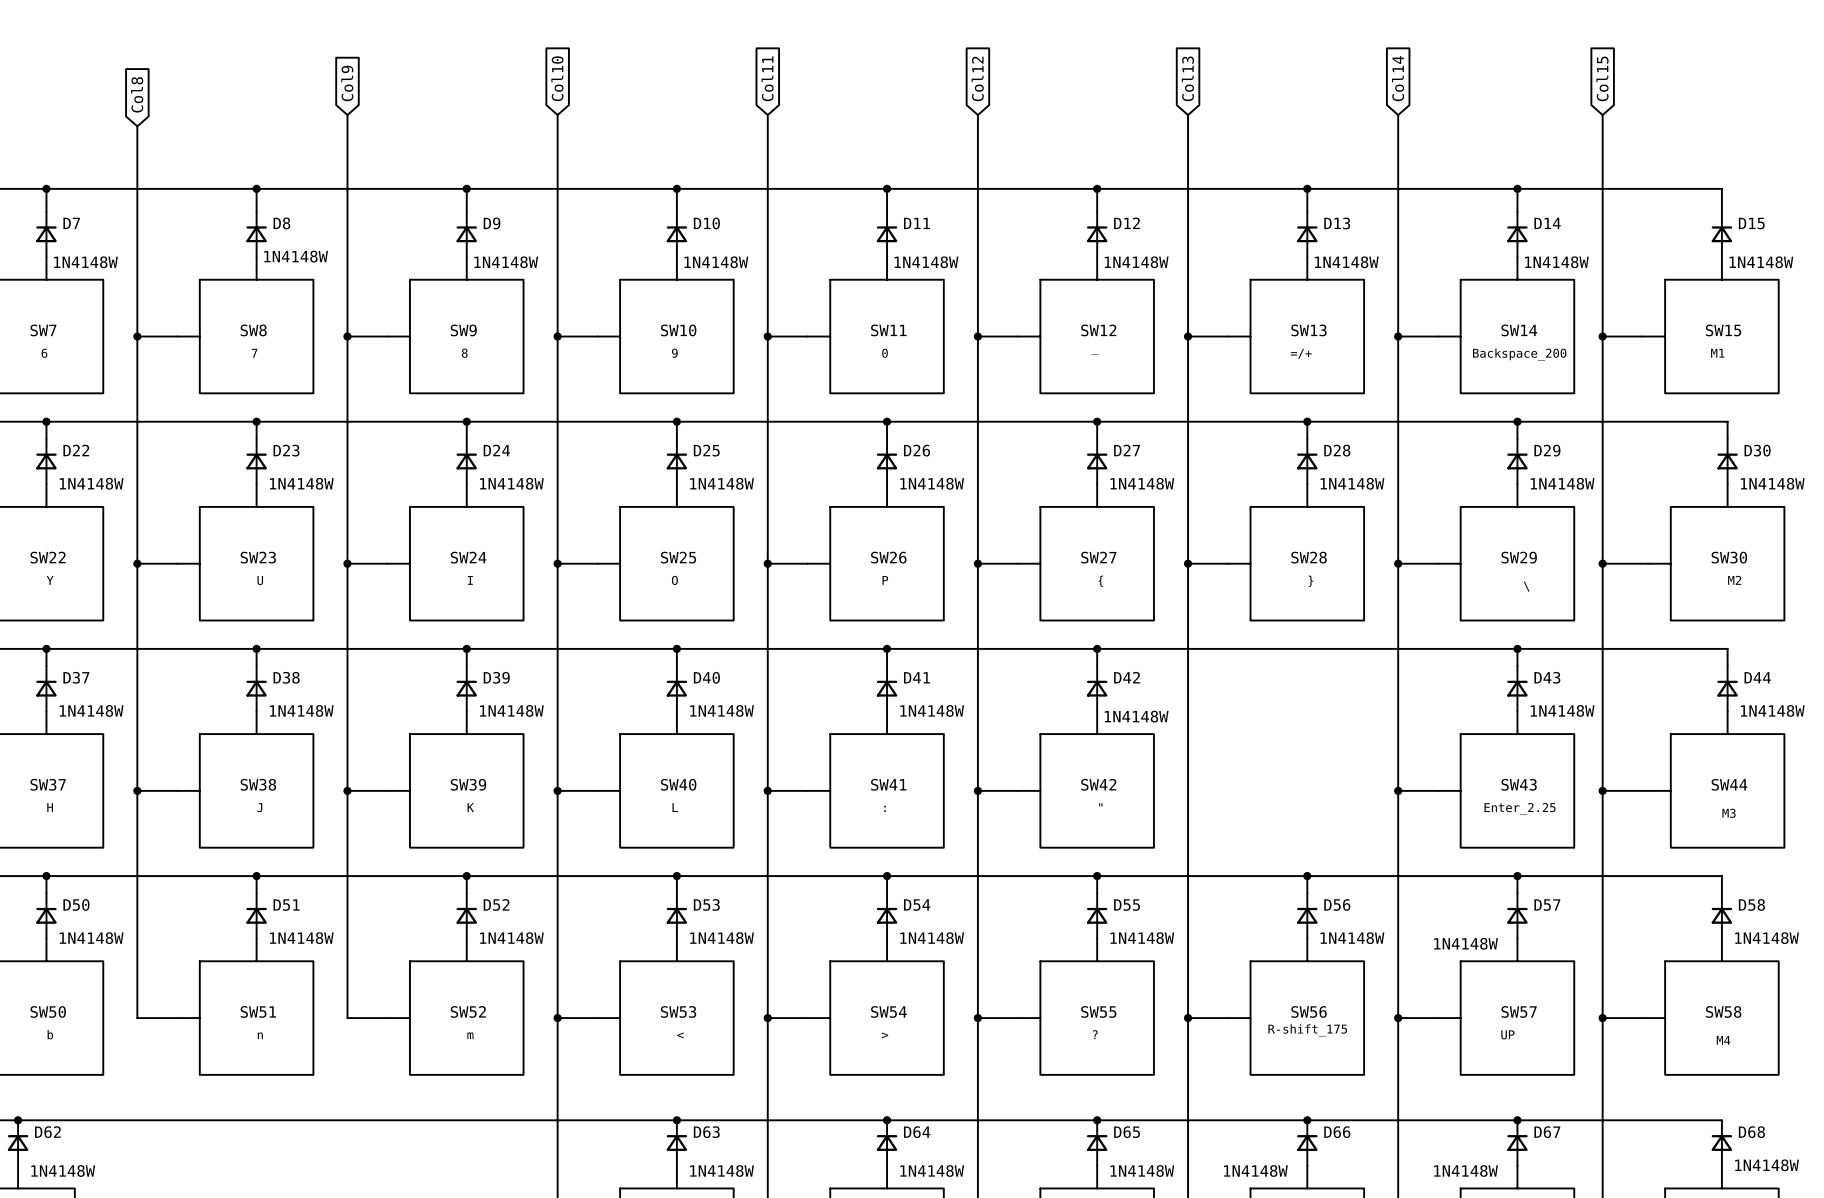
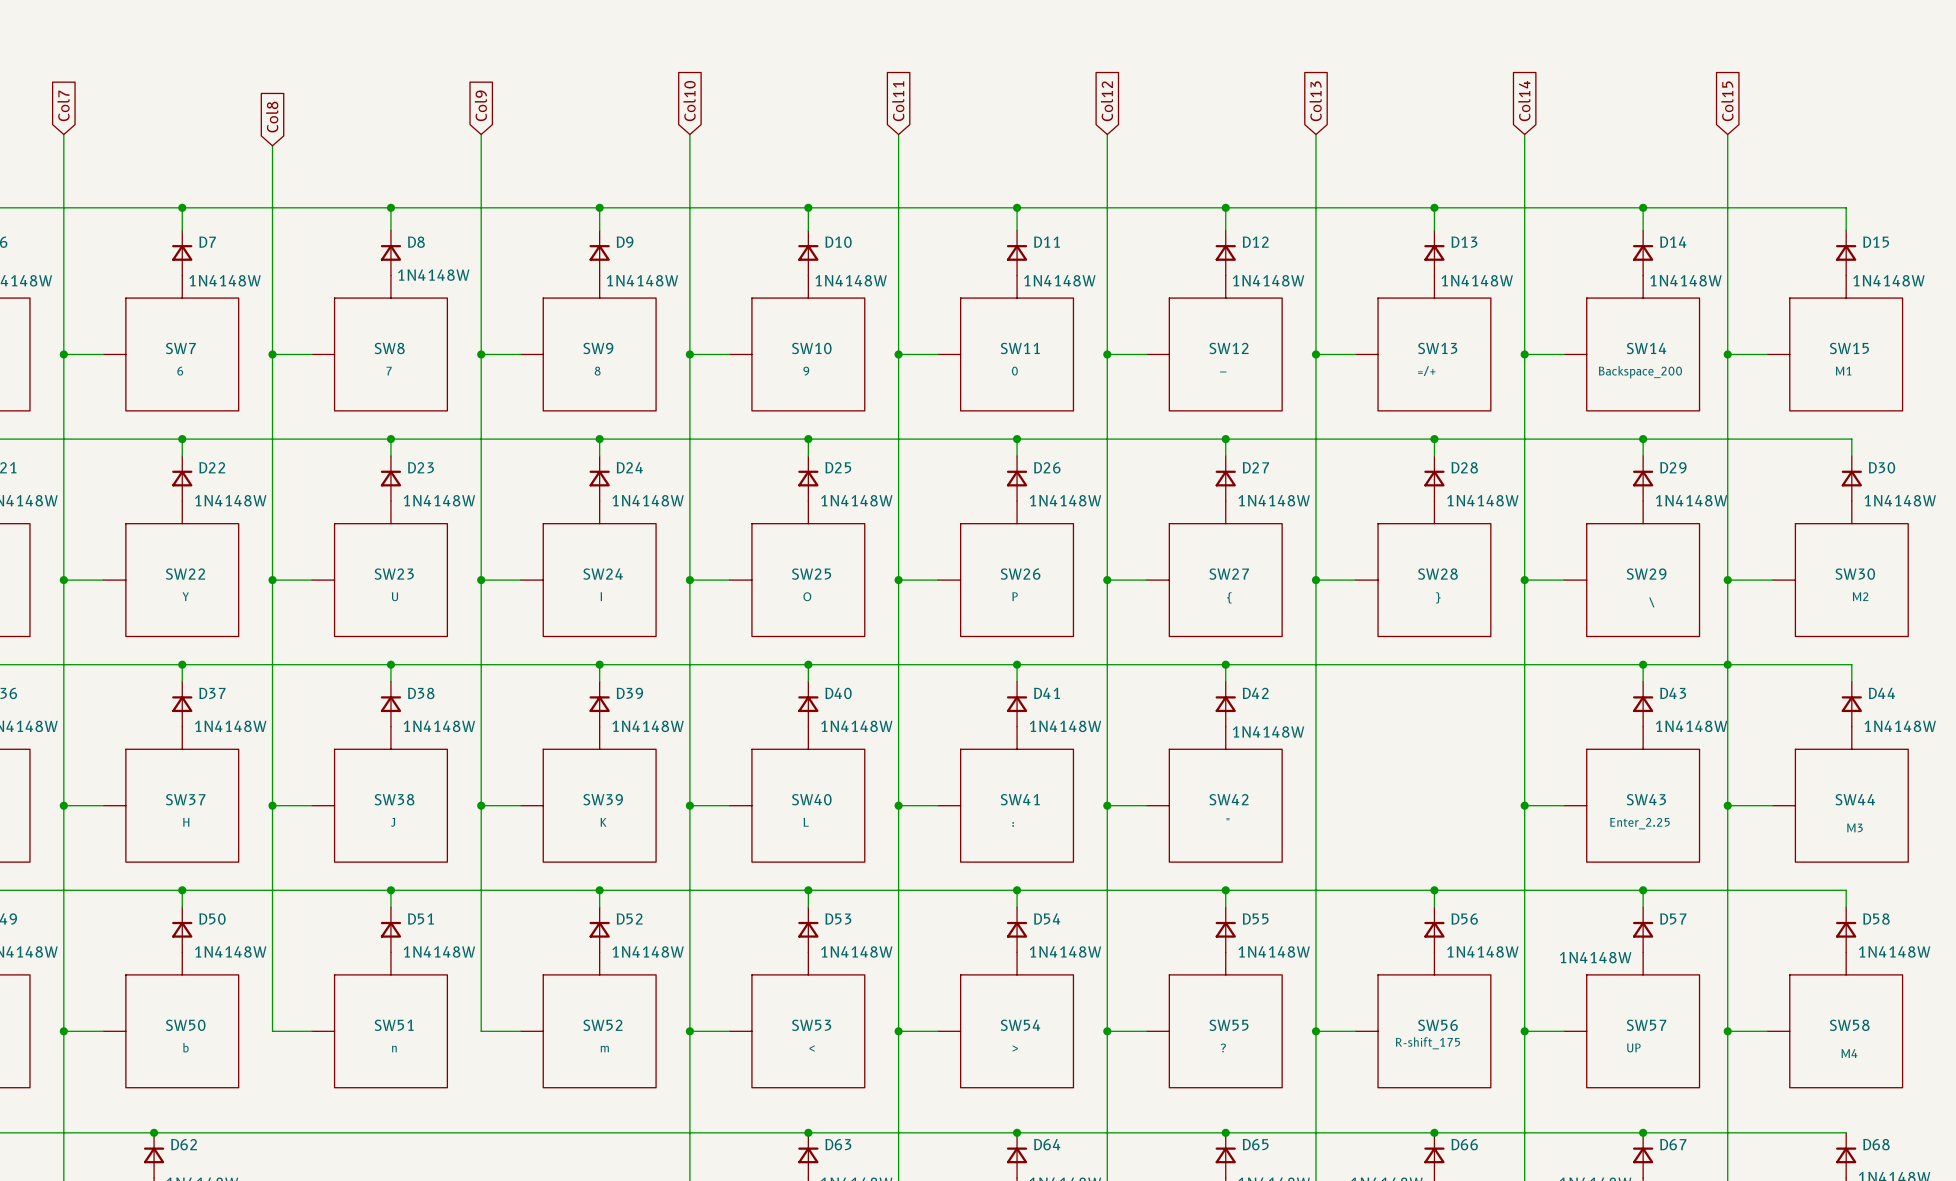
junction: none -> (1727, 664)

